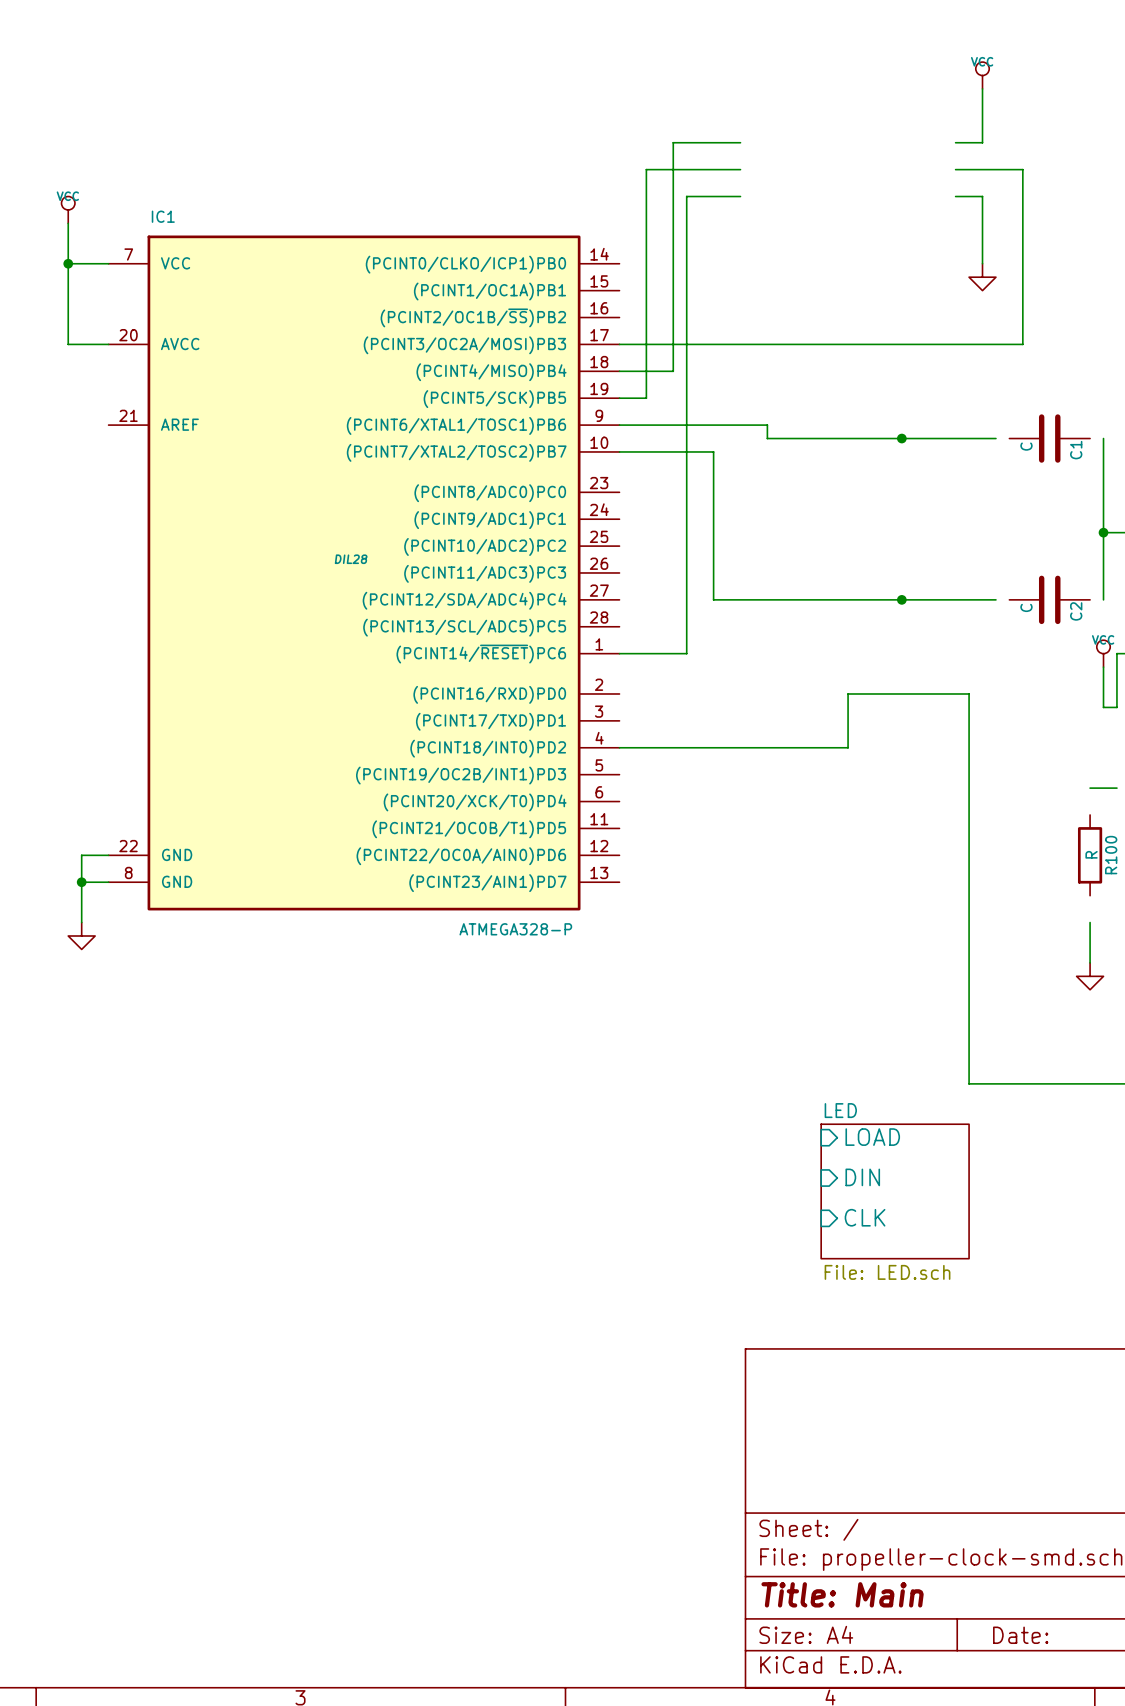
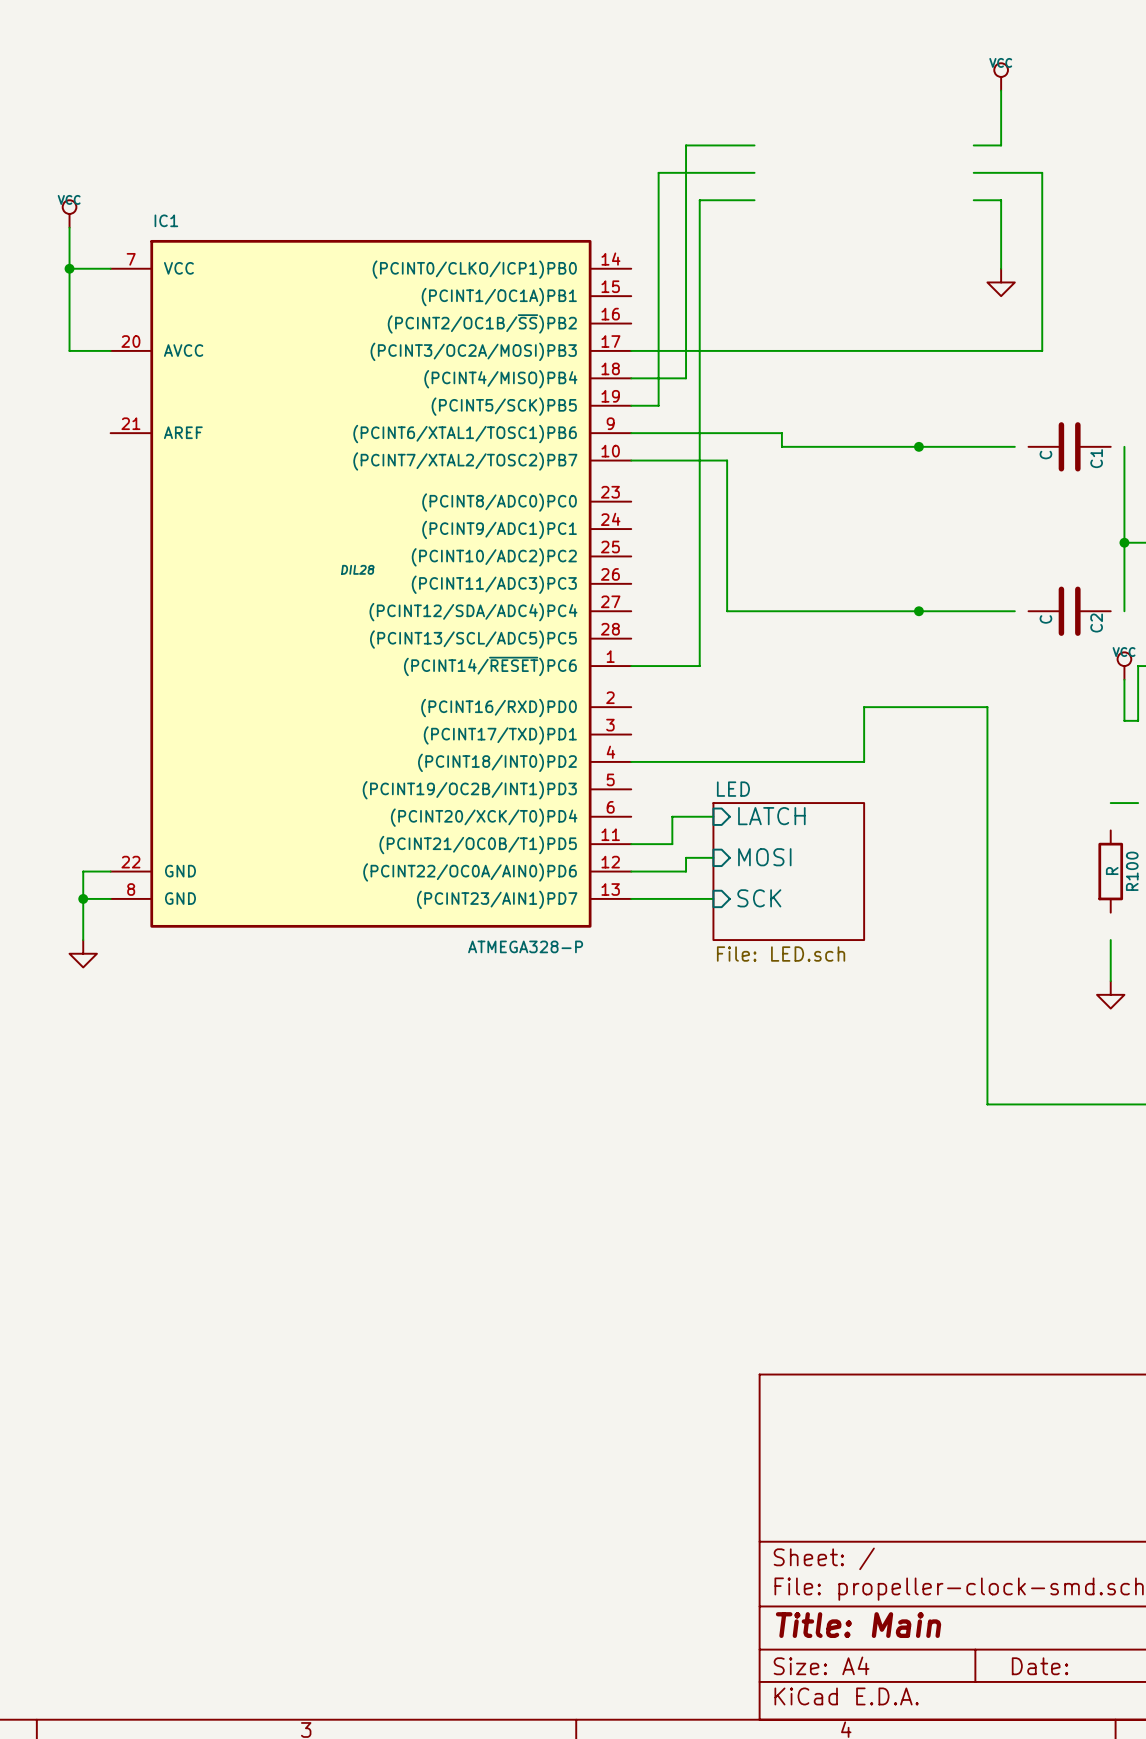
sheet pin: none -> LATCH (771, 816)
wire: none -> (713, 816) (672, 816) (672, 844) (631, 844)
wire: none -> (713, 857) (686, 857) (686, 871) (631, 871)
sheet pin: none -> MOSI (764, 857)
sheet LED: none -> File: LED.sch (788, 871)
sheet pin: none -> SCK (759, 898)
wire: none -> (631, 898) (713, 898)
sheet pin: LOAD (872, 1137) -> none
sheet pin: DIN (862, 1177) -> none
sheet LED: File: LED.sch (895, 1191) -> none
sheet pin: CLK (865, 1217) -> none

